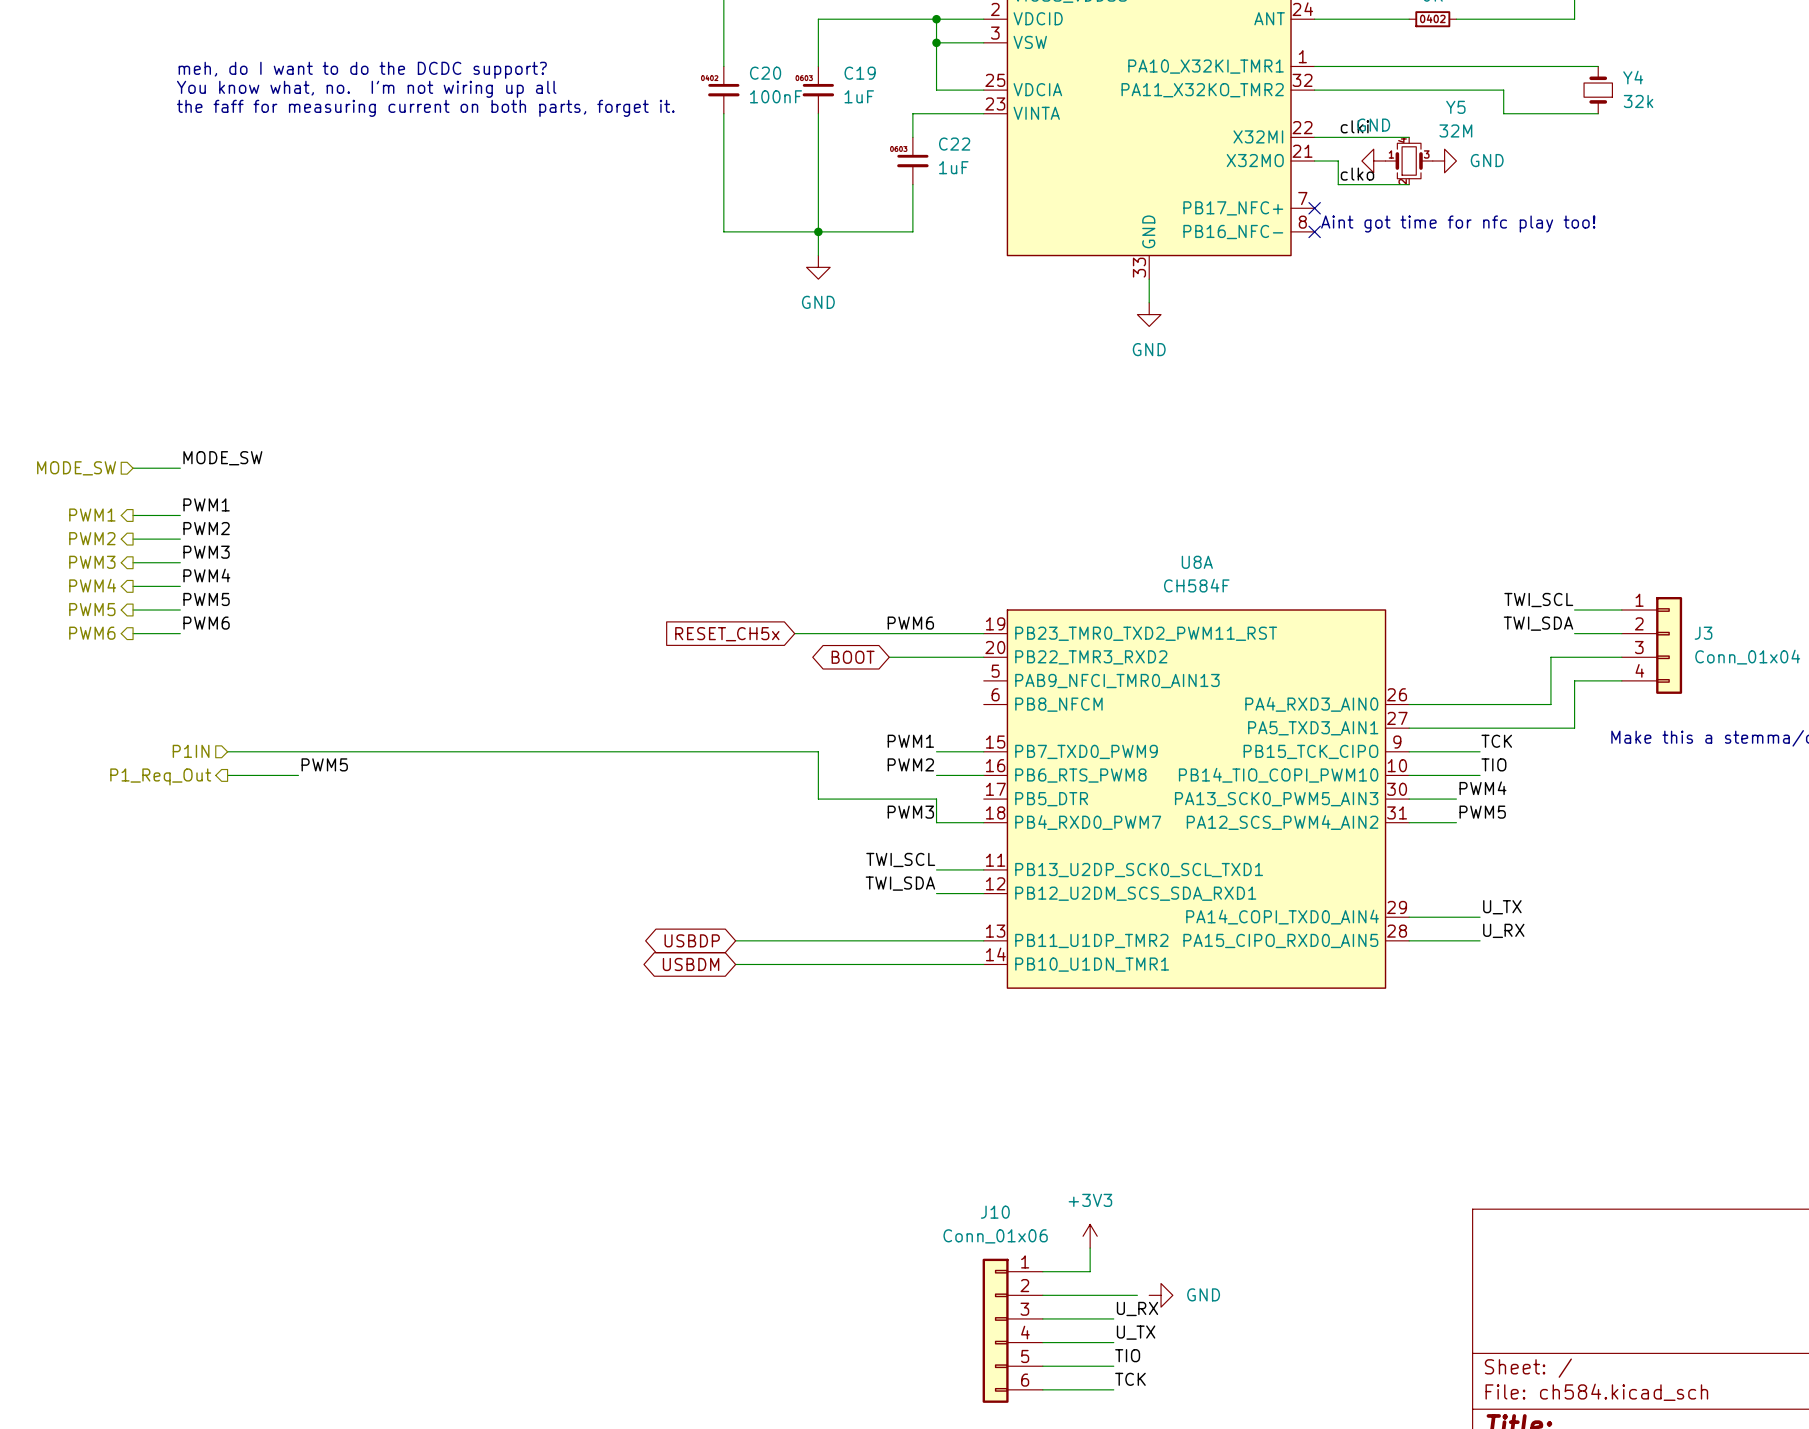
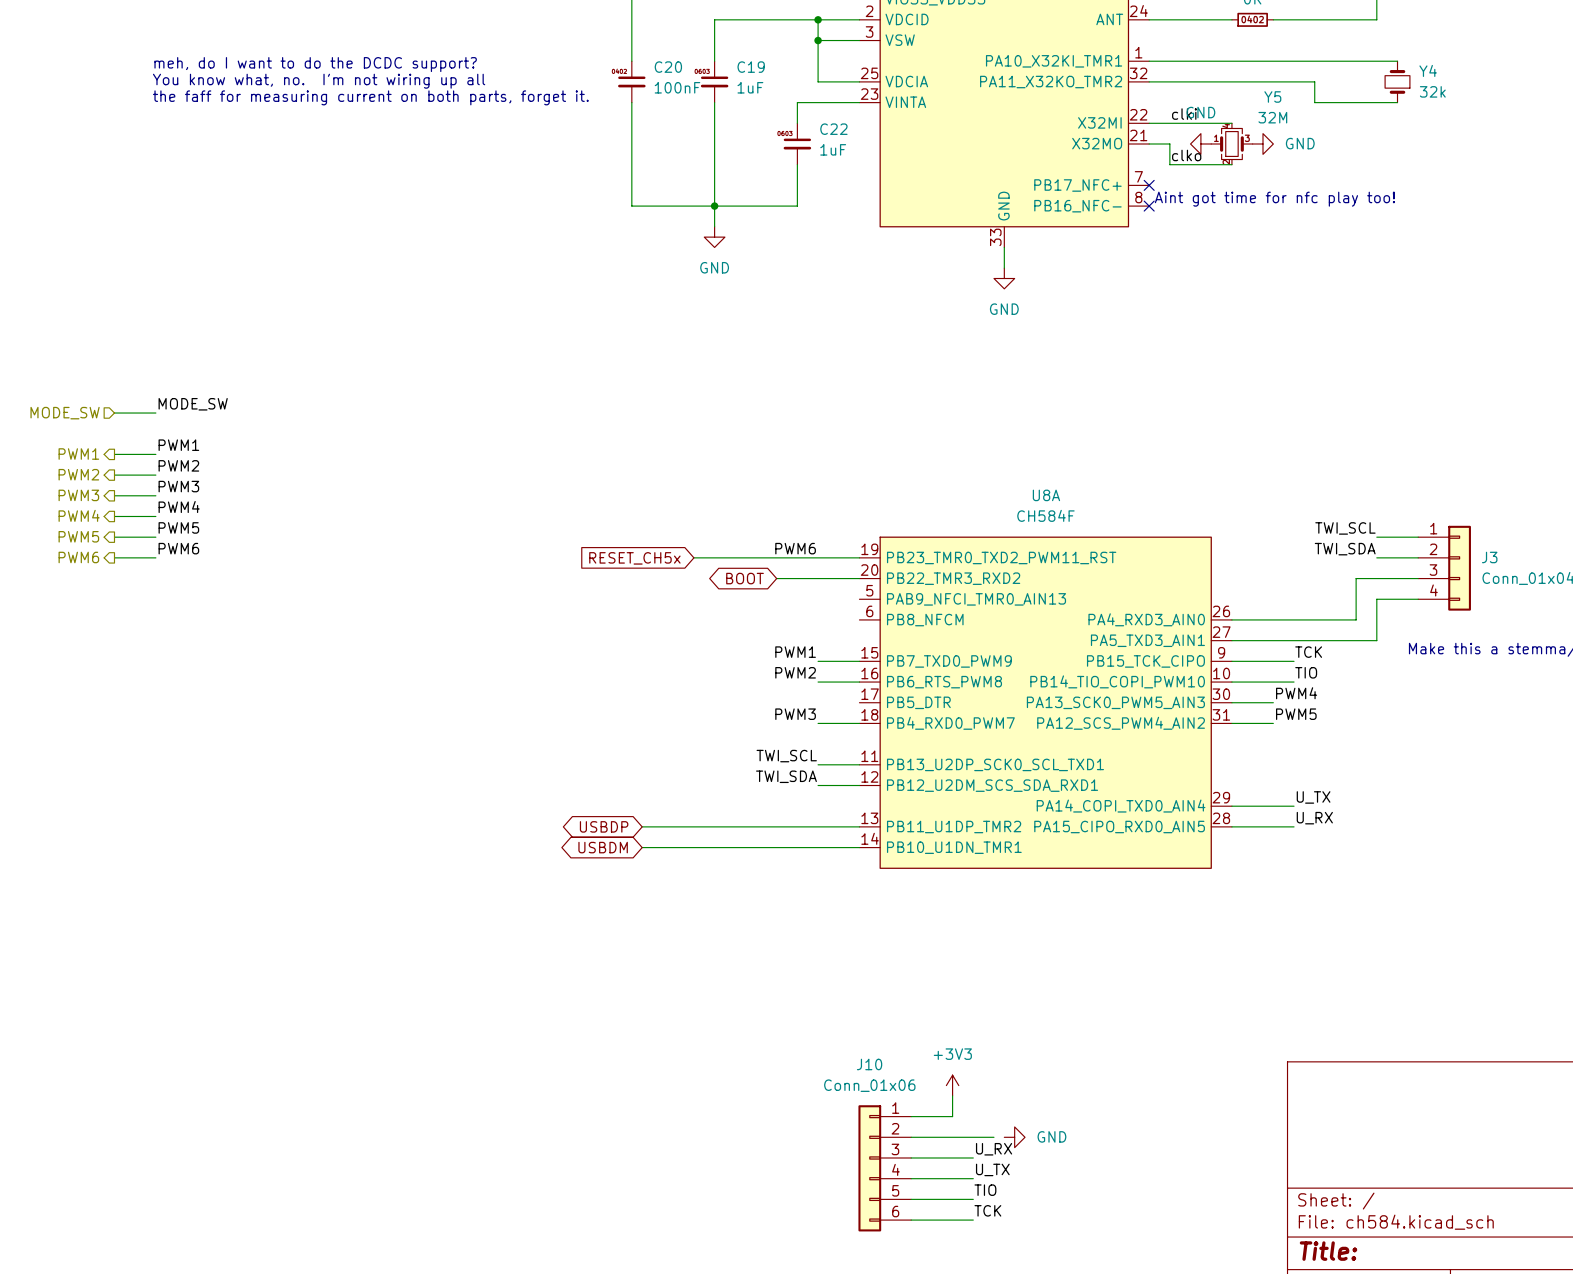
hierarchical label: P1IN (191, 751) -> none
wire: (227, 751) (818, 751) (818, 799) (936, 799) (936, 822) -> none
label: PWM5 (324, 764) -> none
wire: (227, 775) (298, 775) -> none
hierarchical label: P1_Req_Out (160, 776) -> none

